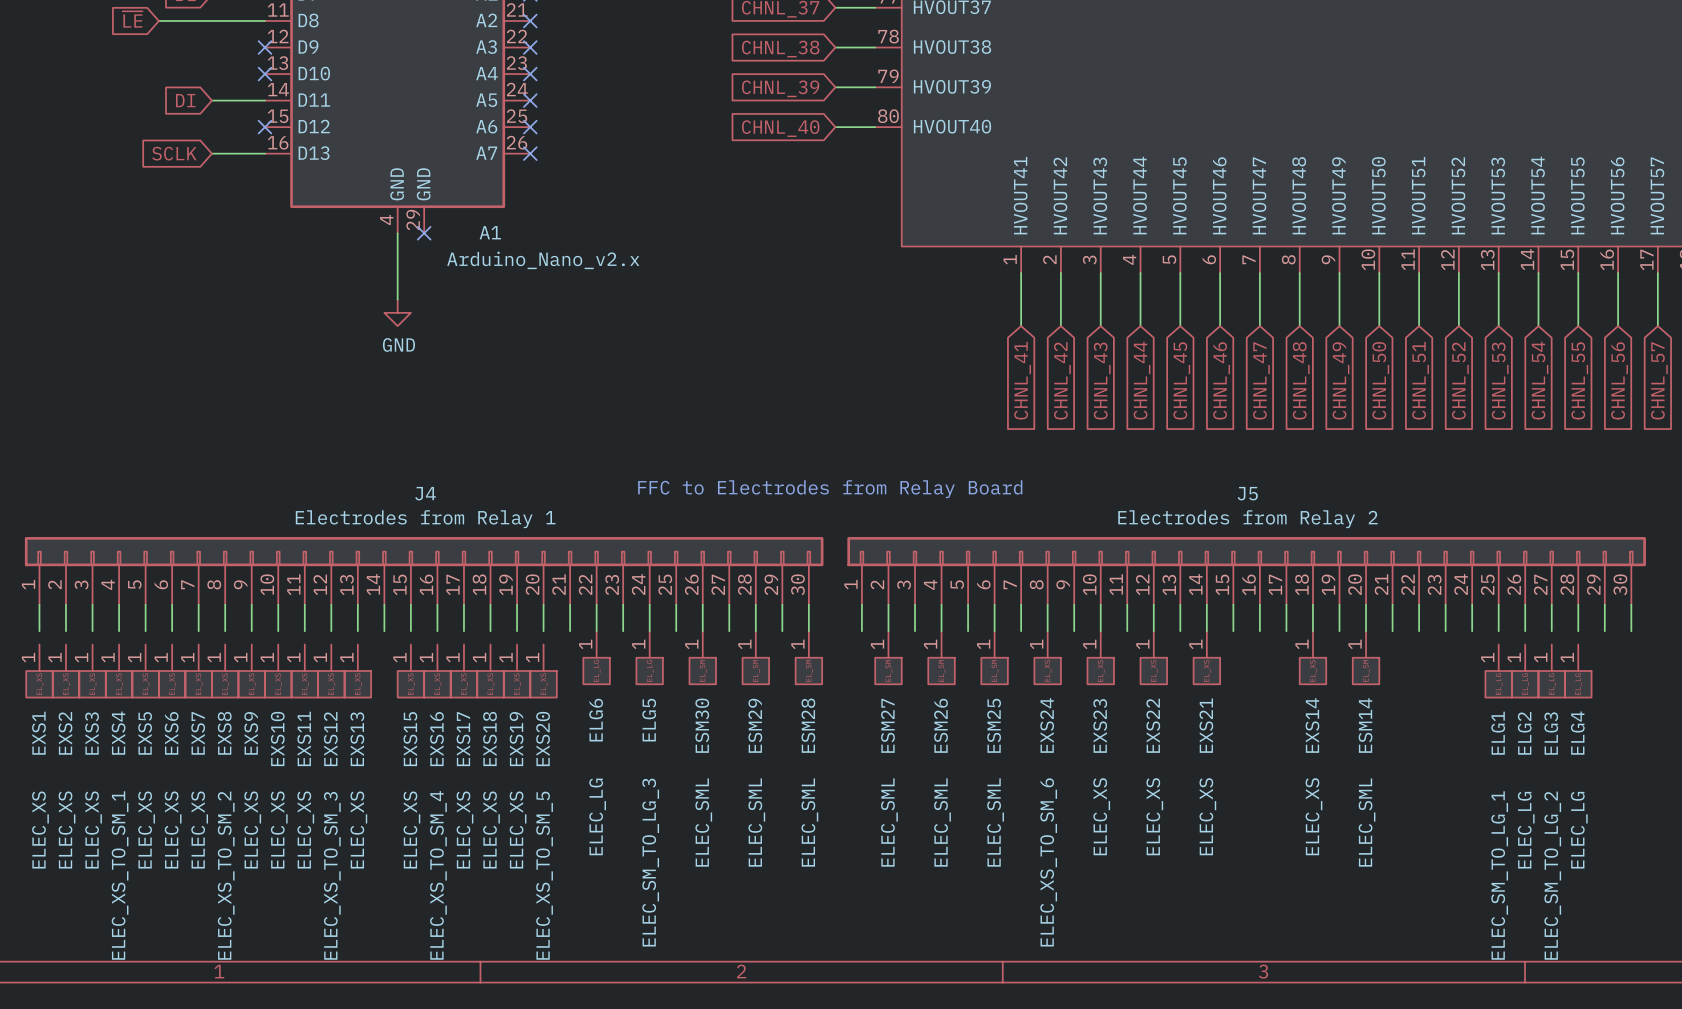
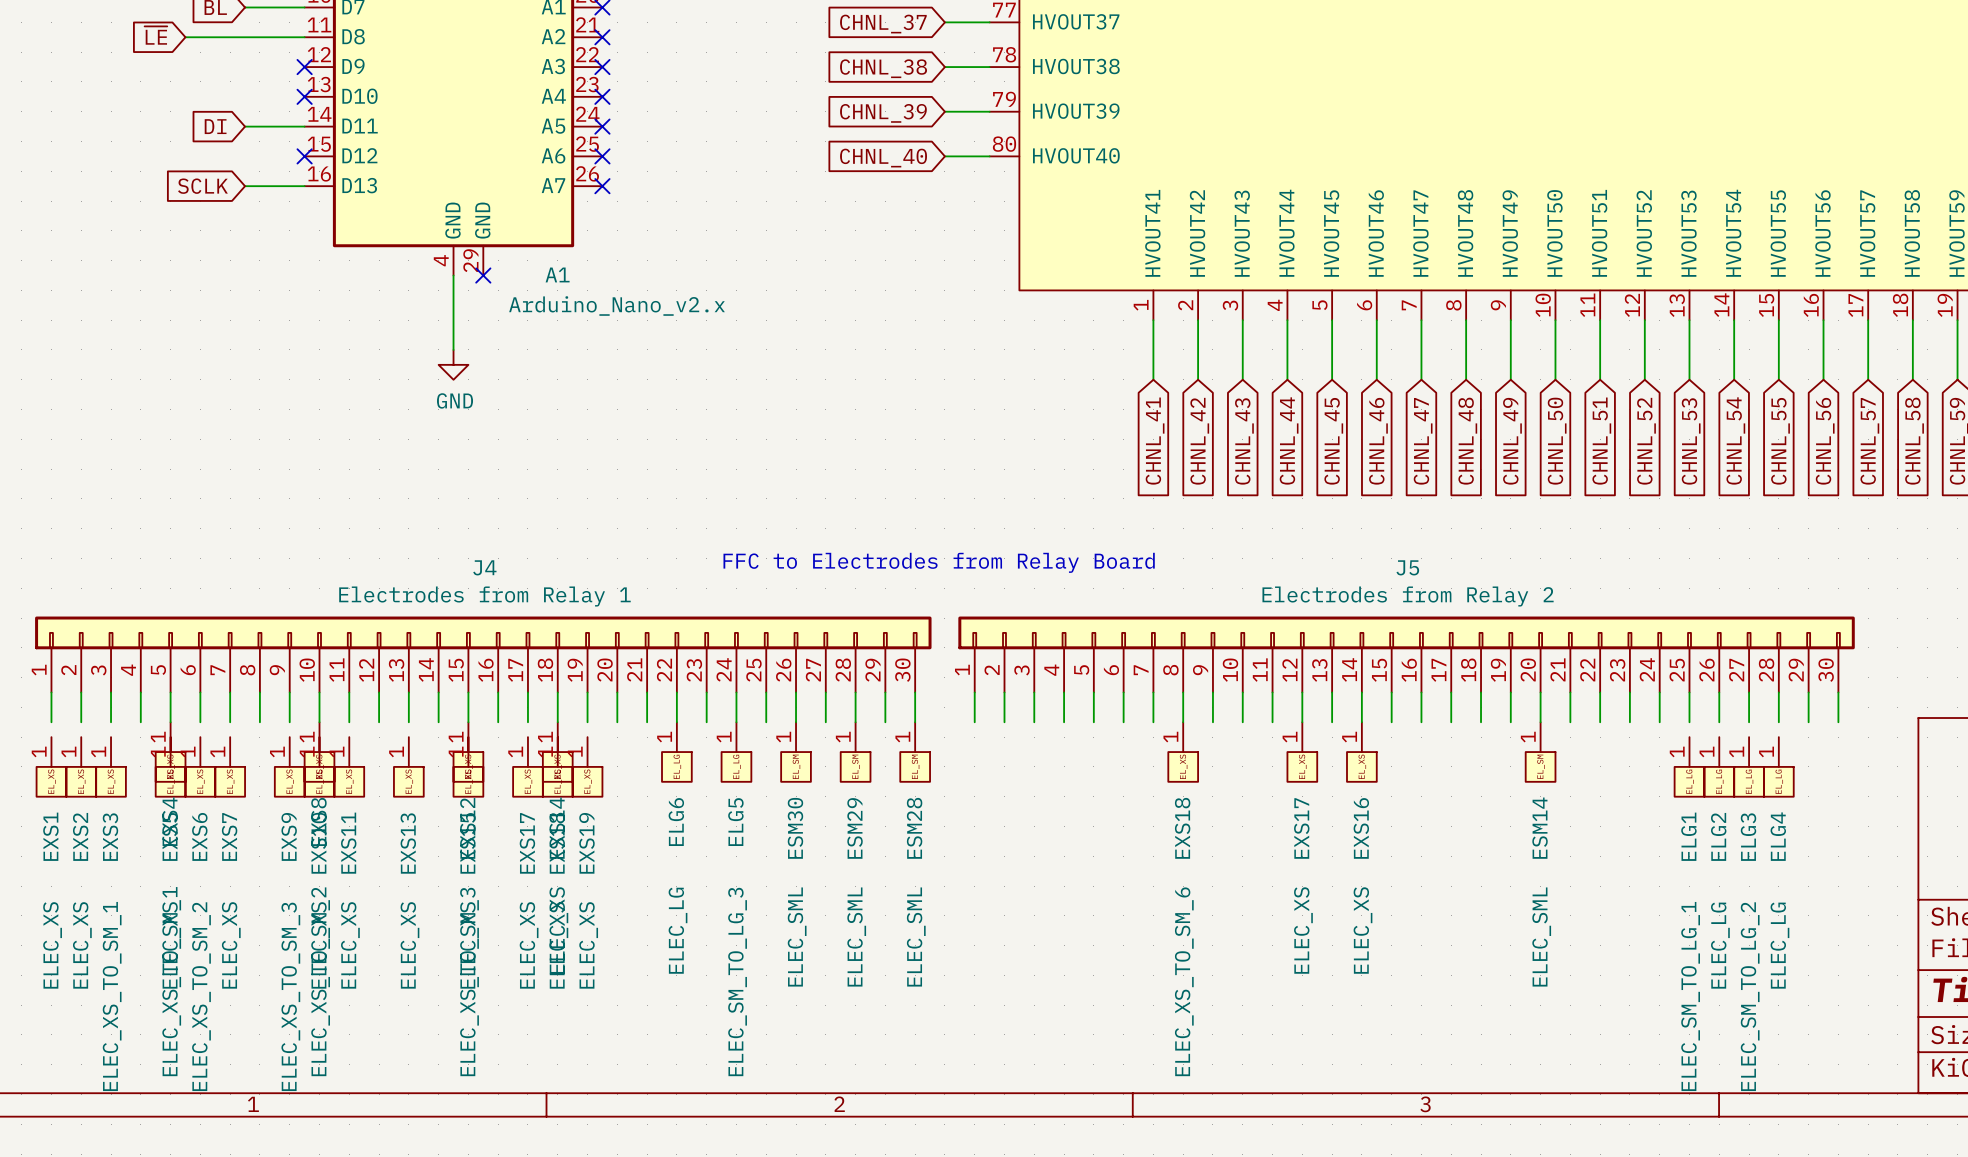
ESM27: ELEC_SML (888, 657) -> none
ESM26: ELEC_SML (941, 657) -> none
ESM25: ELEC_SML (994, 657) -> none
EXS23: ELEC_XS (1100, 657) -> none
EXS14 position: (1312, 657) -> (557, 752)
EXS4 position: (119, 671) -> (170, 752)
EXS8 position: (225, 671) -> (319, 752)
EXS12 position: (331, 671) -> (468, 752)
EXS16: ELEC_XS_TO_SM_4 (437, 671) -> none
EXS20: ELEC_XS_TO_SM_5 (543, 671) -> none
EXS24 name: EXS24 (1047, 725) -> EXS18 (1182, 828)
EXS22 name: EXS22 (1153, 725) -> EXS17 (1301, 828)
EXS21 name: EXS21 (1206, 725) -> EXS16 (1361, 828)
EXS3 value: ELEC_XS (93, 830) -> ELEC_XS_TO_SM_1 (112, 996)
EXS6 value: ELEC_XS (173, 830) -> ELEC_XS_TO_SM_2 (201, 996)
EXS9 value: ELEC_XS (252, 830) -> ELEC_XS_TO_SM_3 (290, 996)

